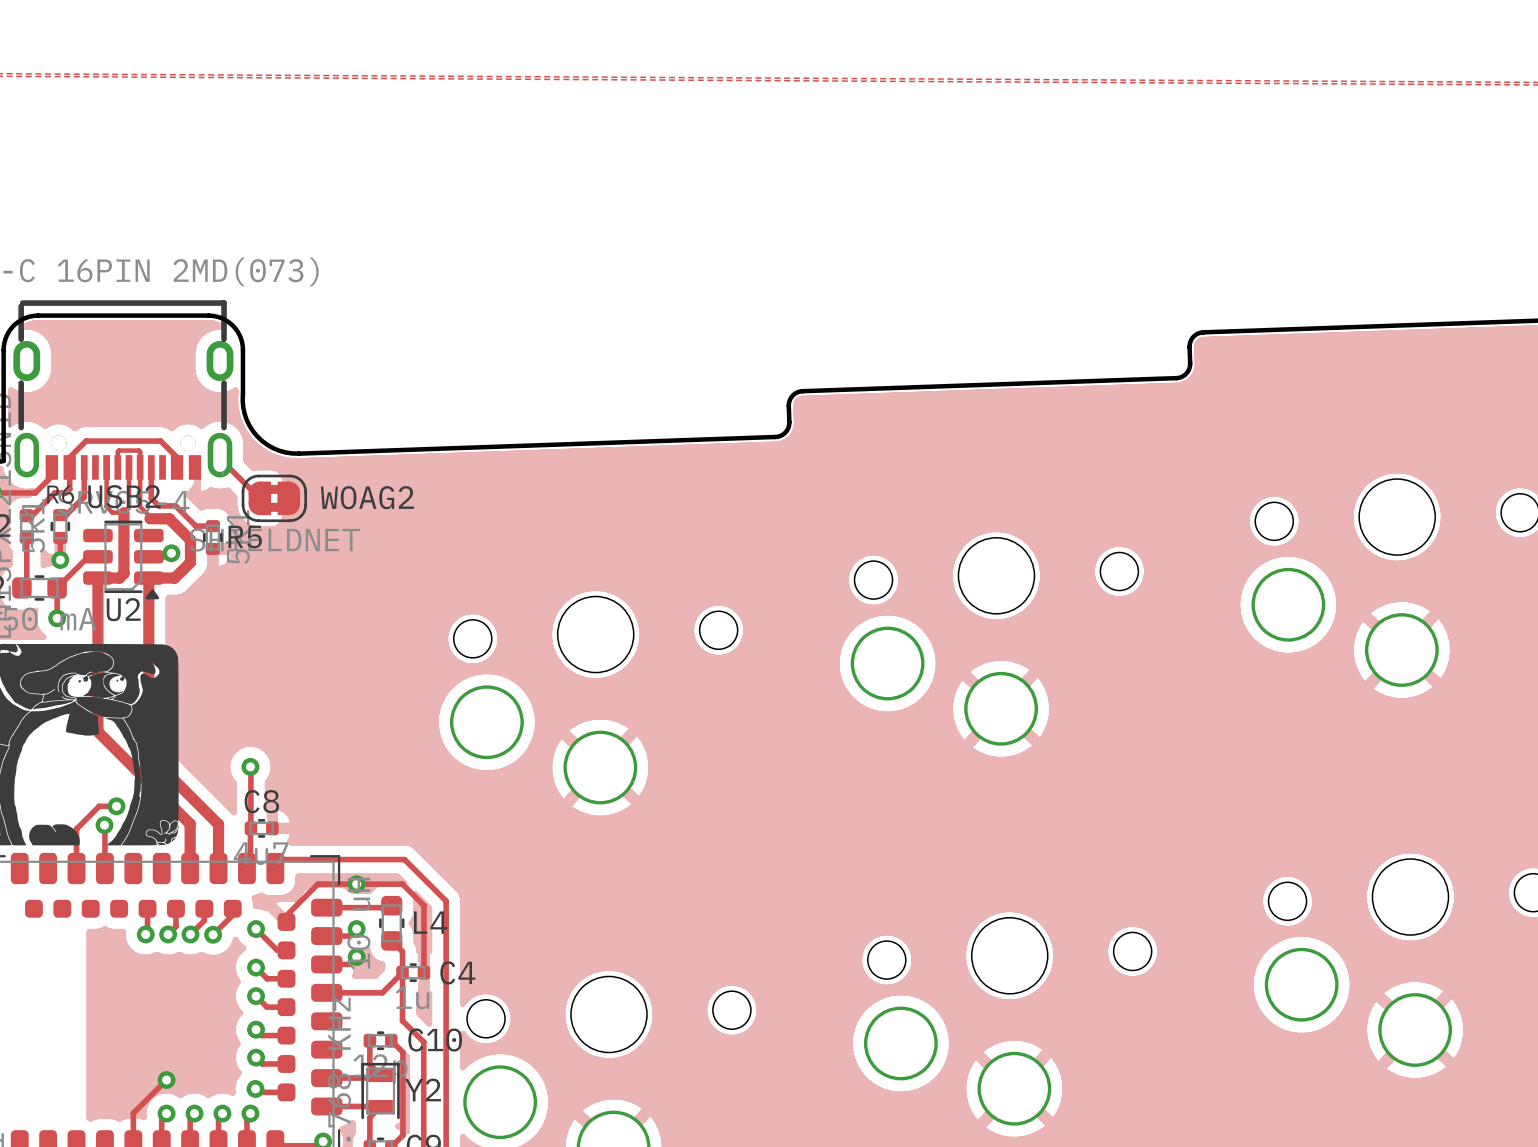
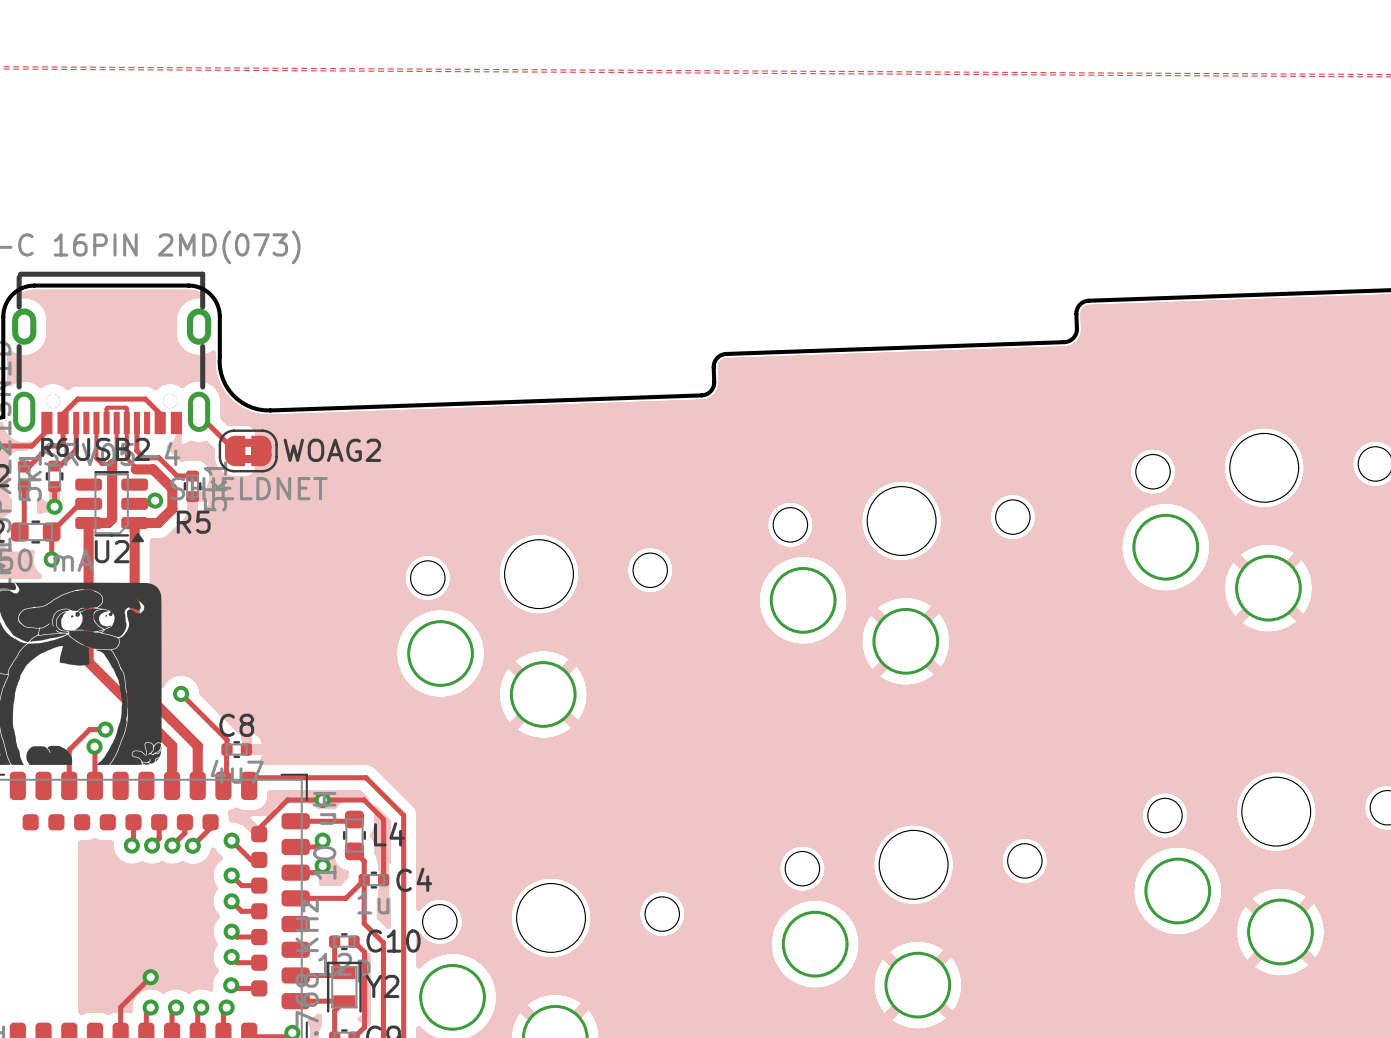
R5 name position: R5 (245, 537) -> R5 (193, 522)
track: (250, 766) (250, 817) -> (181, 693) (227, 739)
via position: (250, 766) -> (181, 693)

